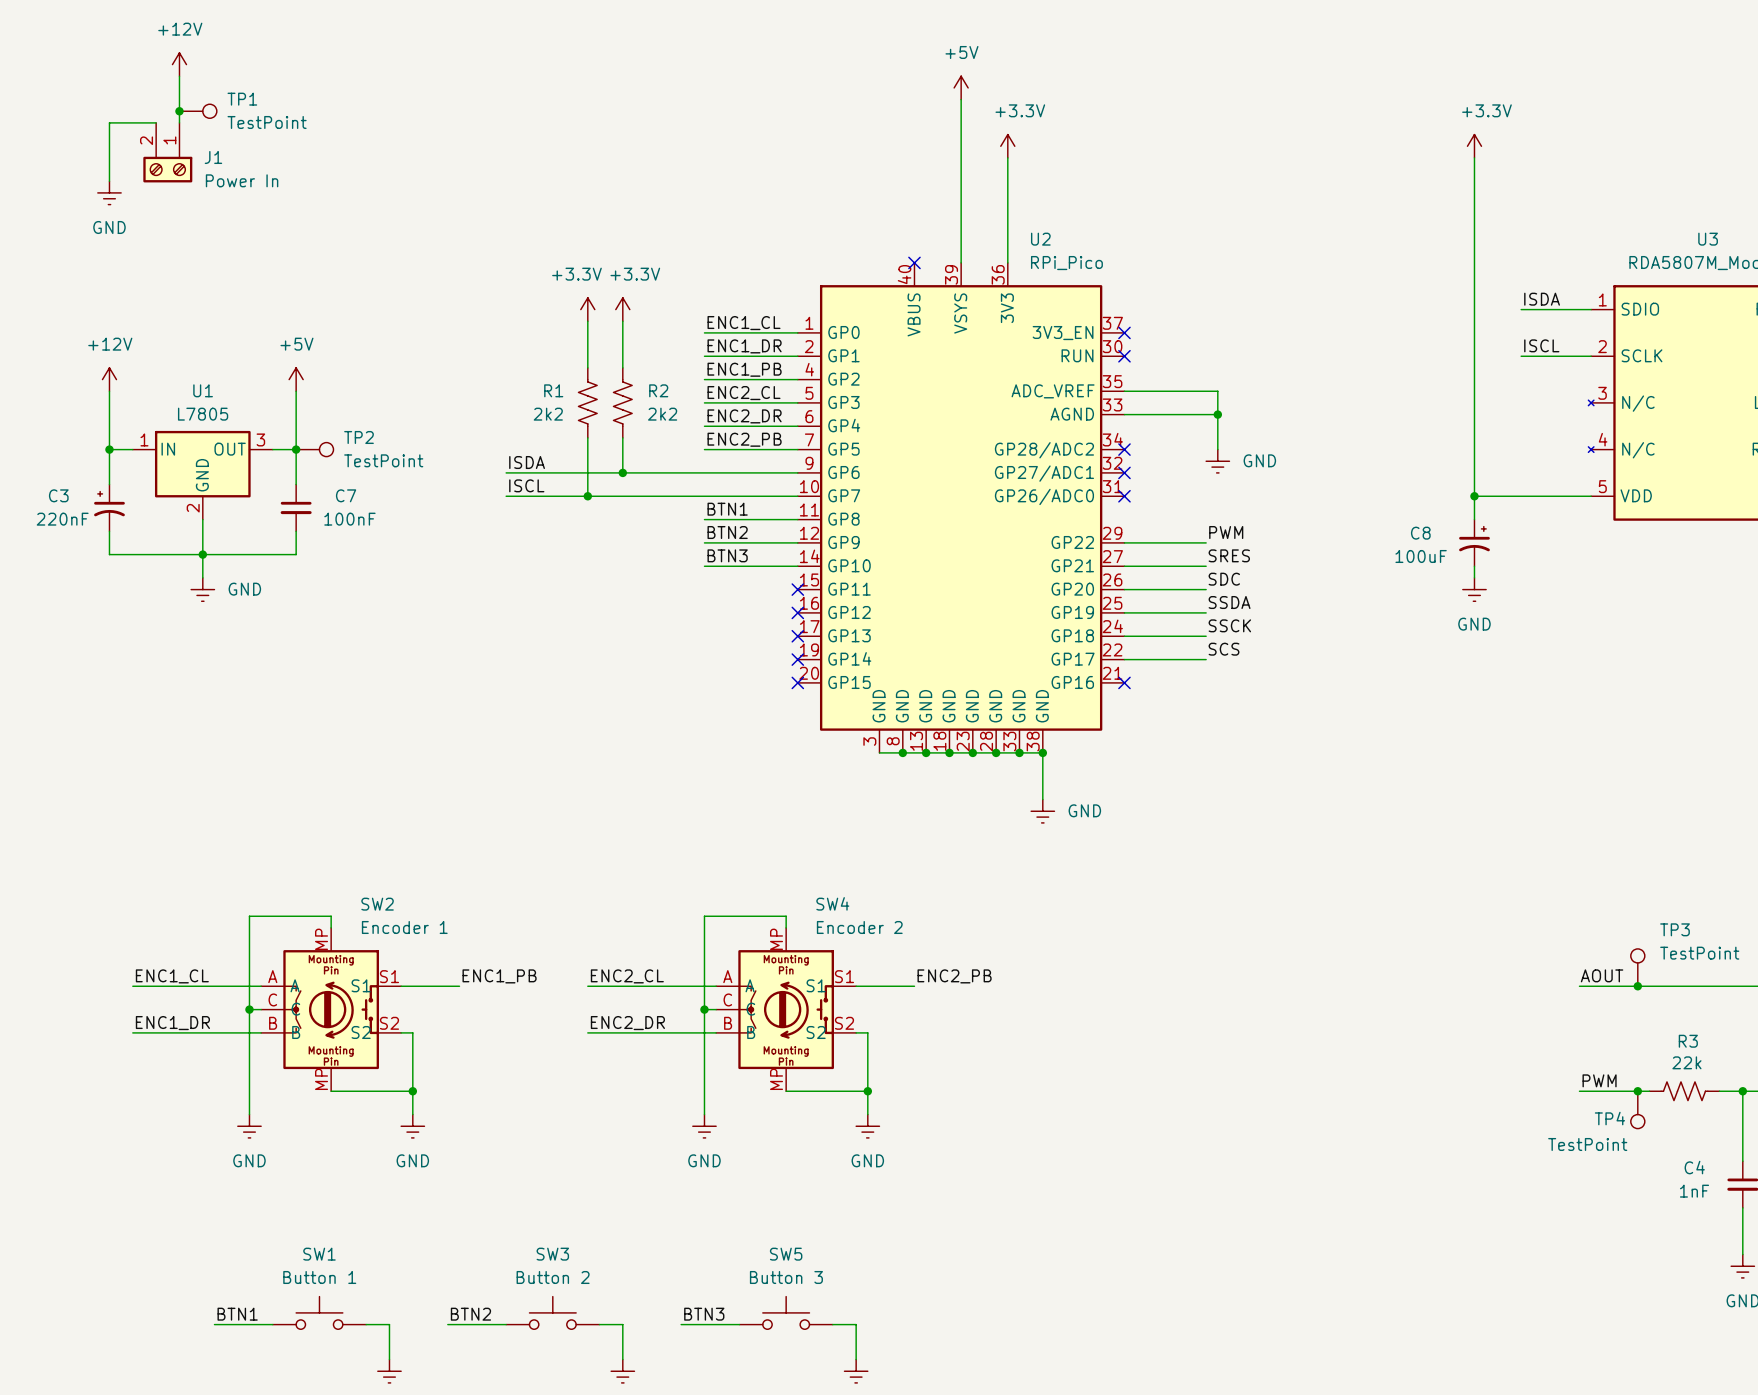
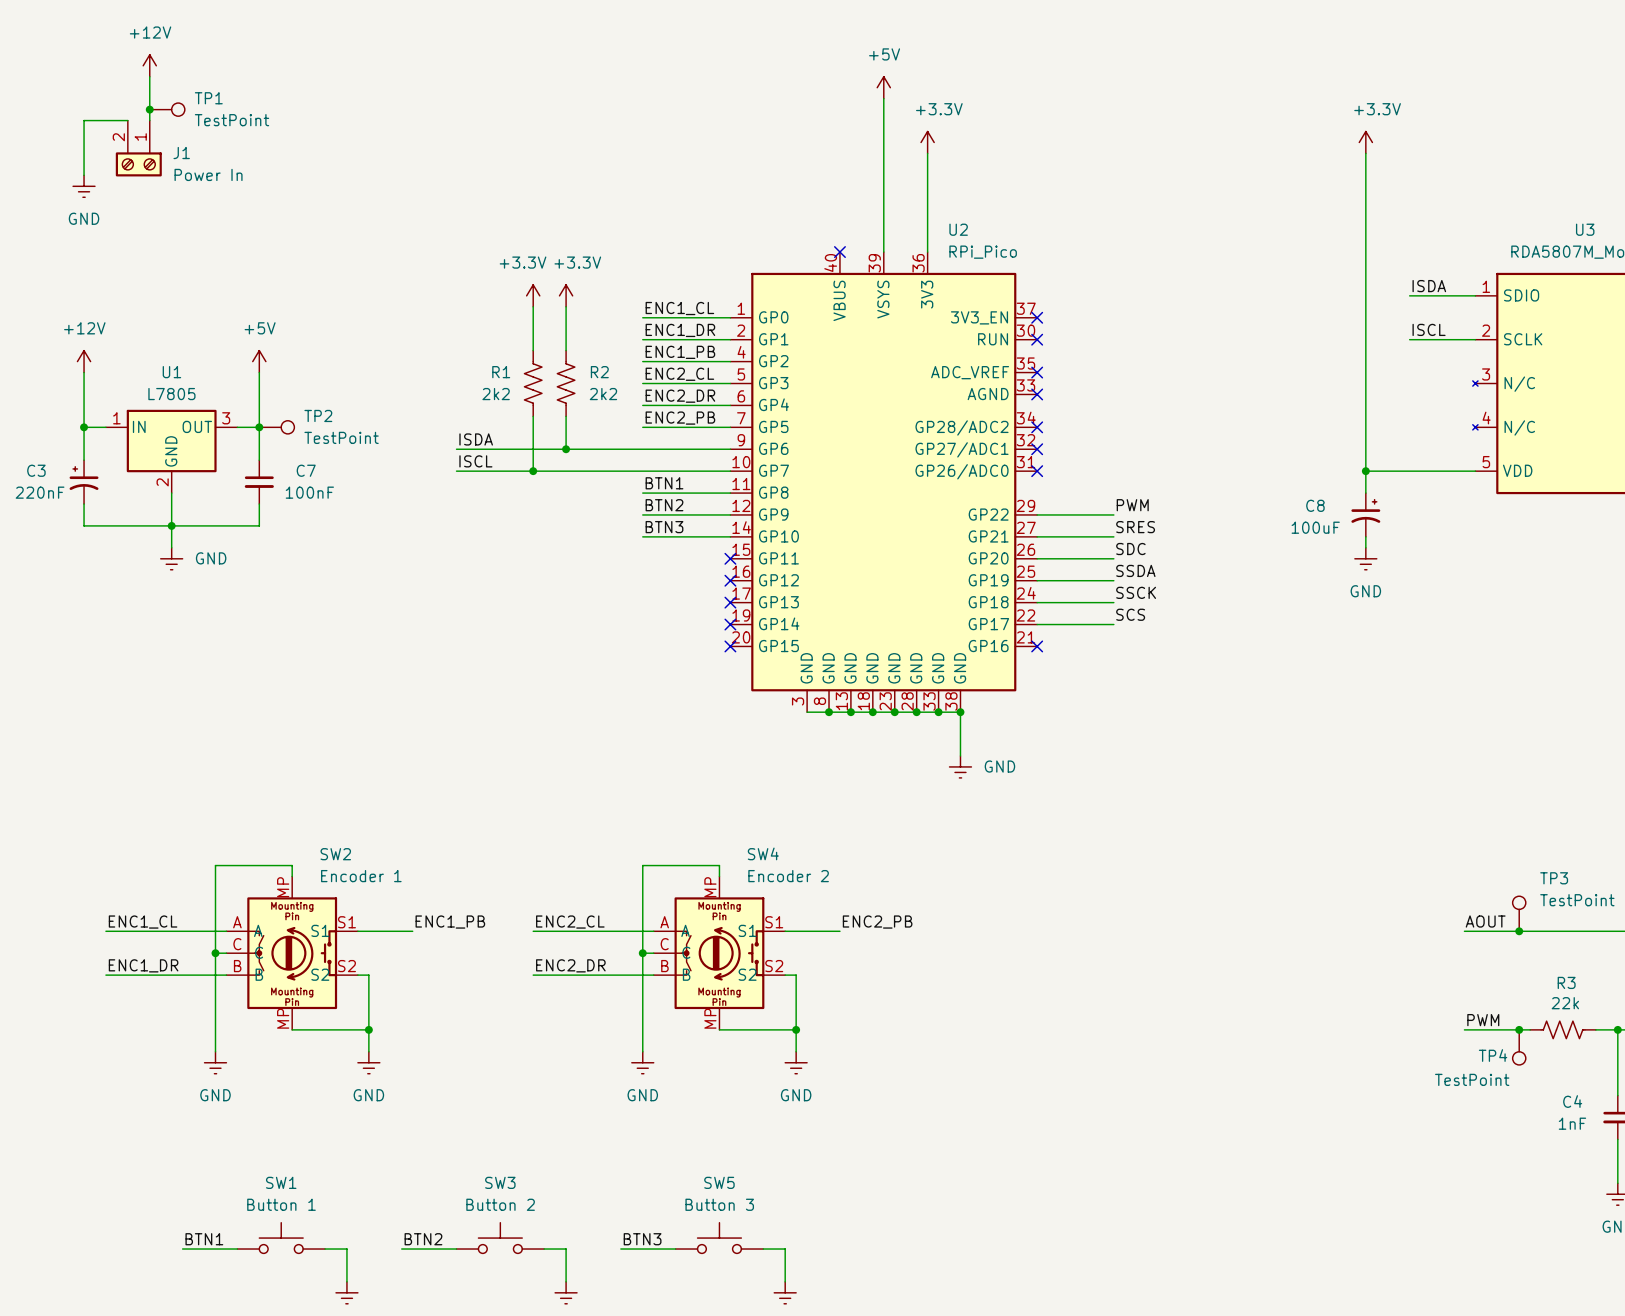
wire: (1124, 391) (1217, 391) (1217, 449) -> none
no-connect mark: none -> (1037, 372)
wire: (1124, 414) (1217, 414) -> none
no-connect mark: none -> (1037, 394)
junction: (1217, 414) -> none
power symbol: GND (1217, 461) -> none

